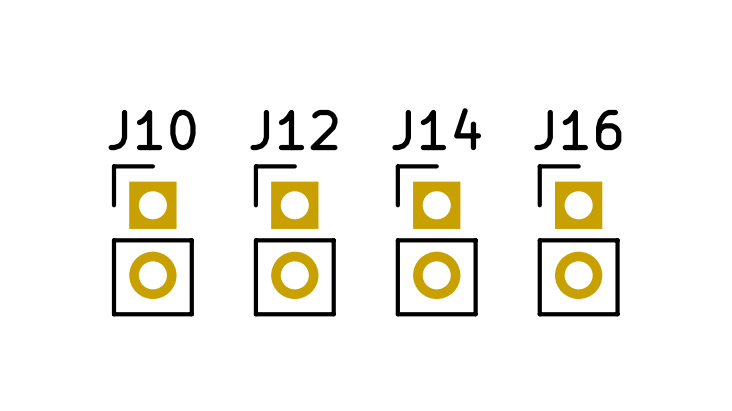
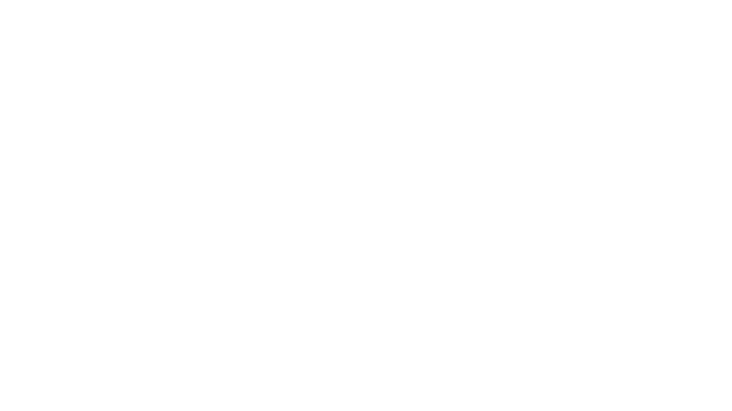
J10: (152, 240) -> none
J12: (294, 240) -> none
J14: (436, 240) -> none
J16: (578, 240) -> none

